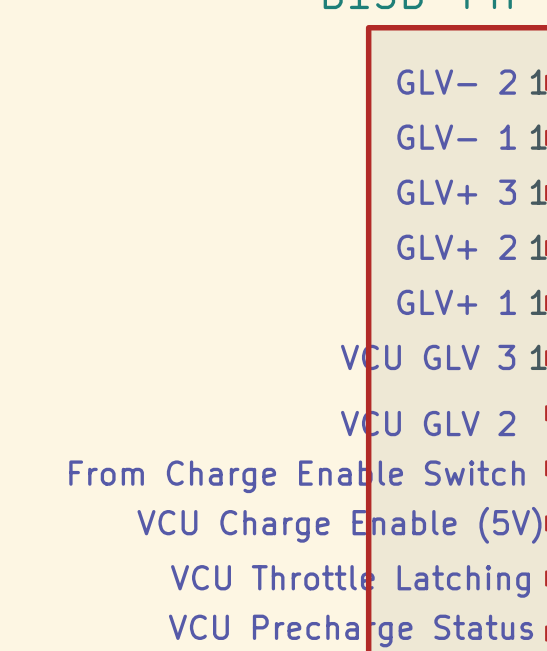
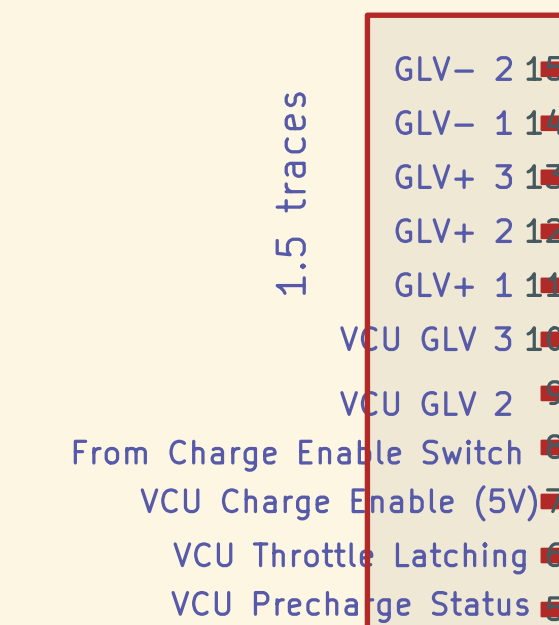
text: none -> 1.5 traces (290, 193)

